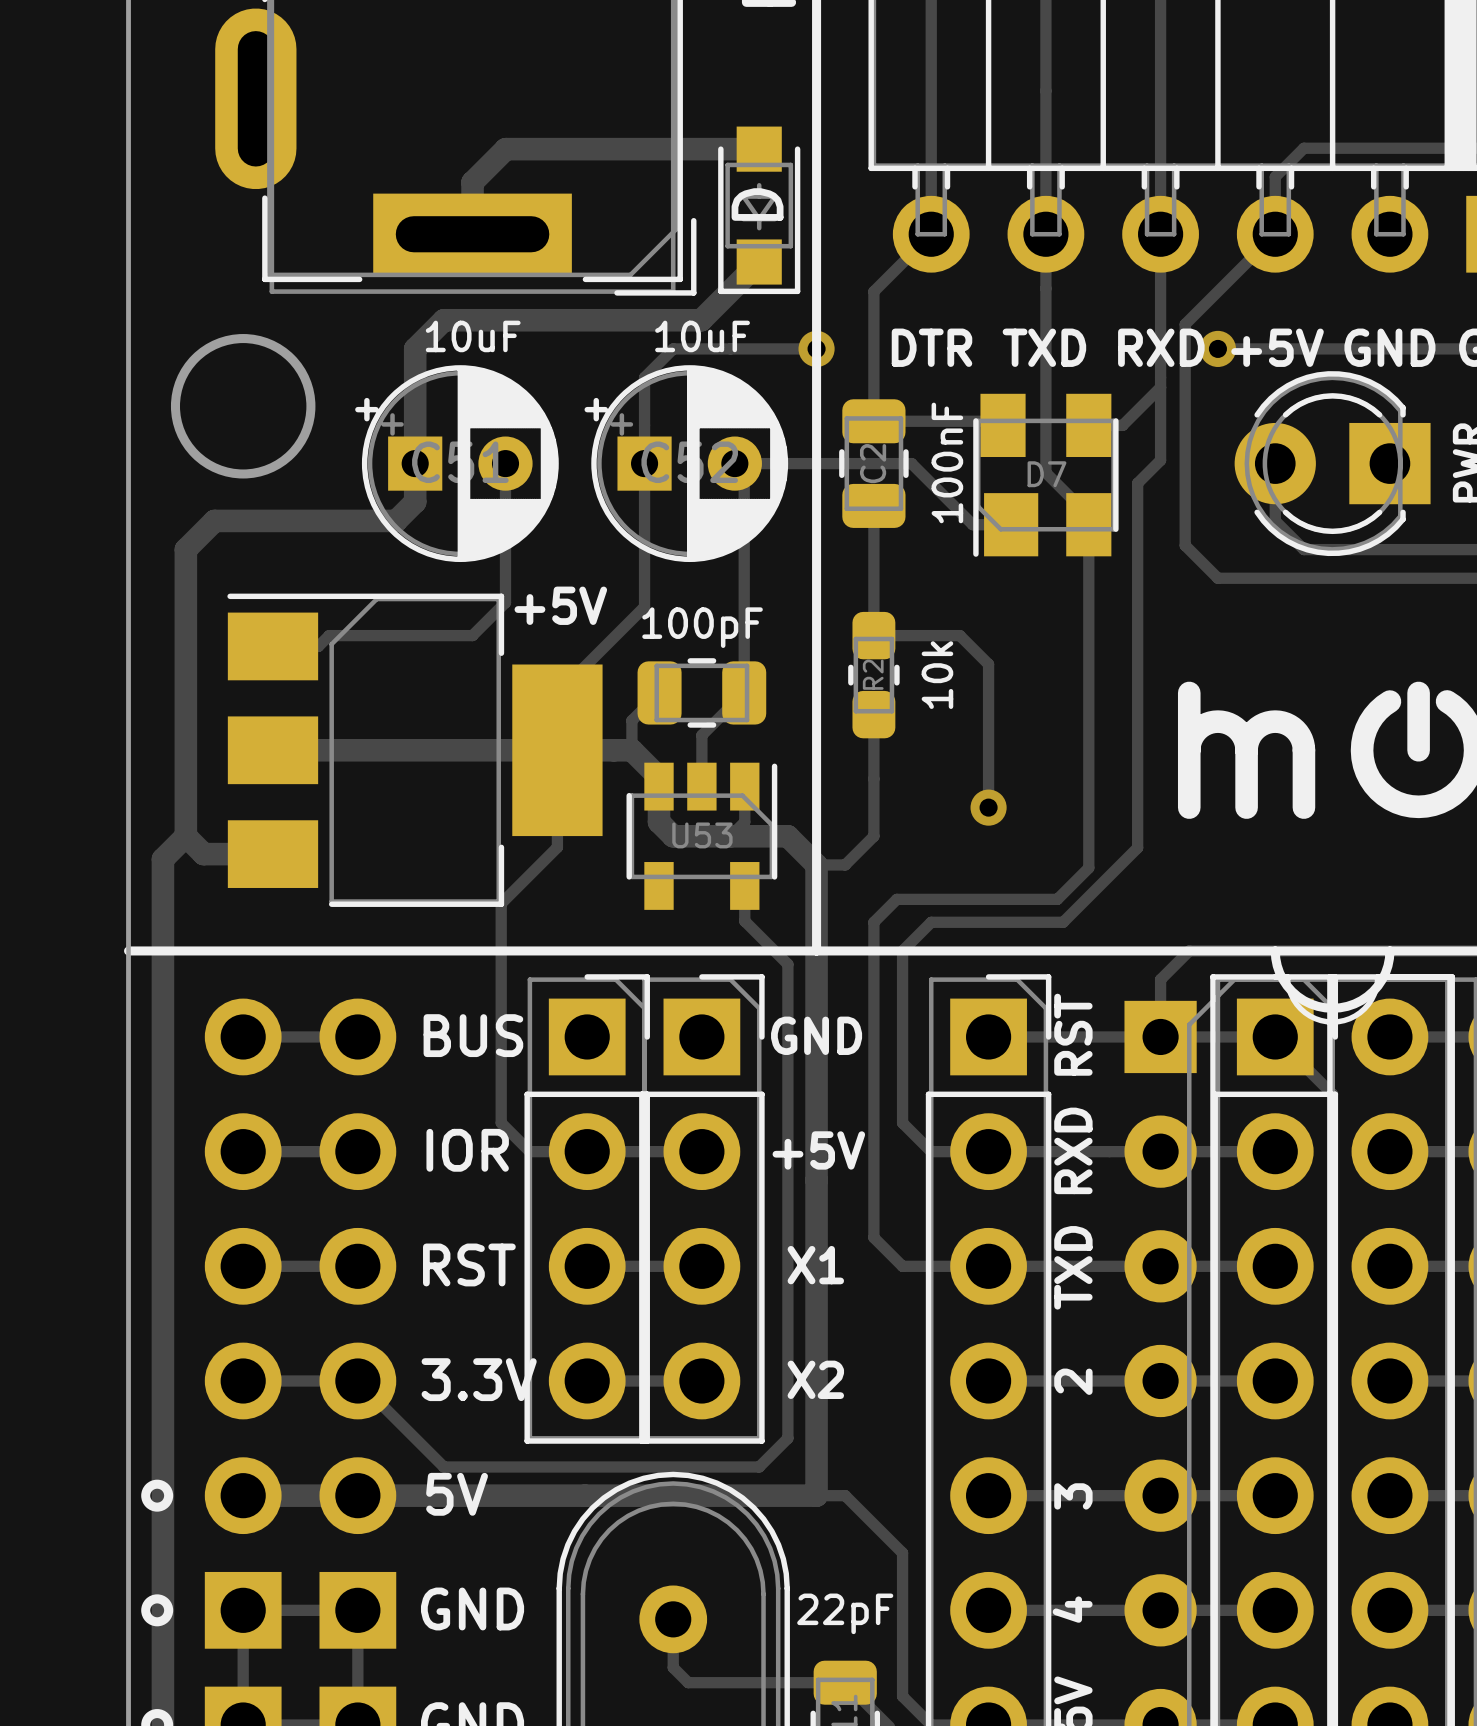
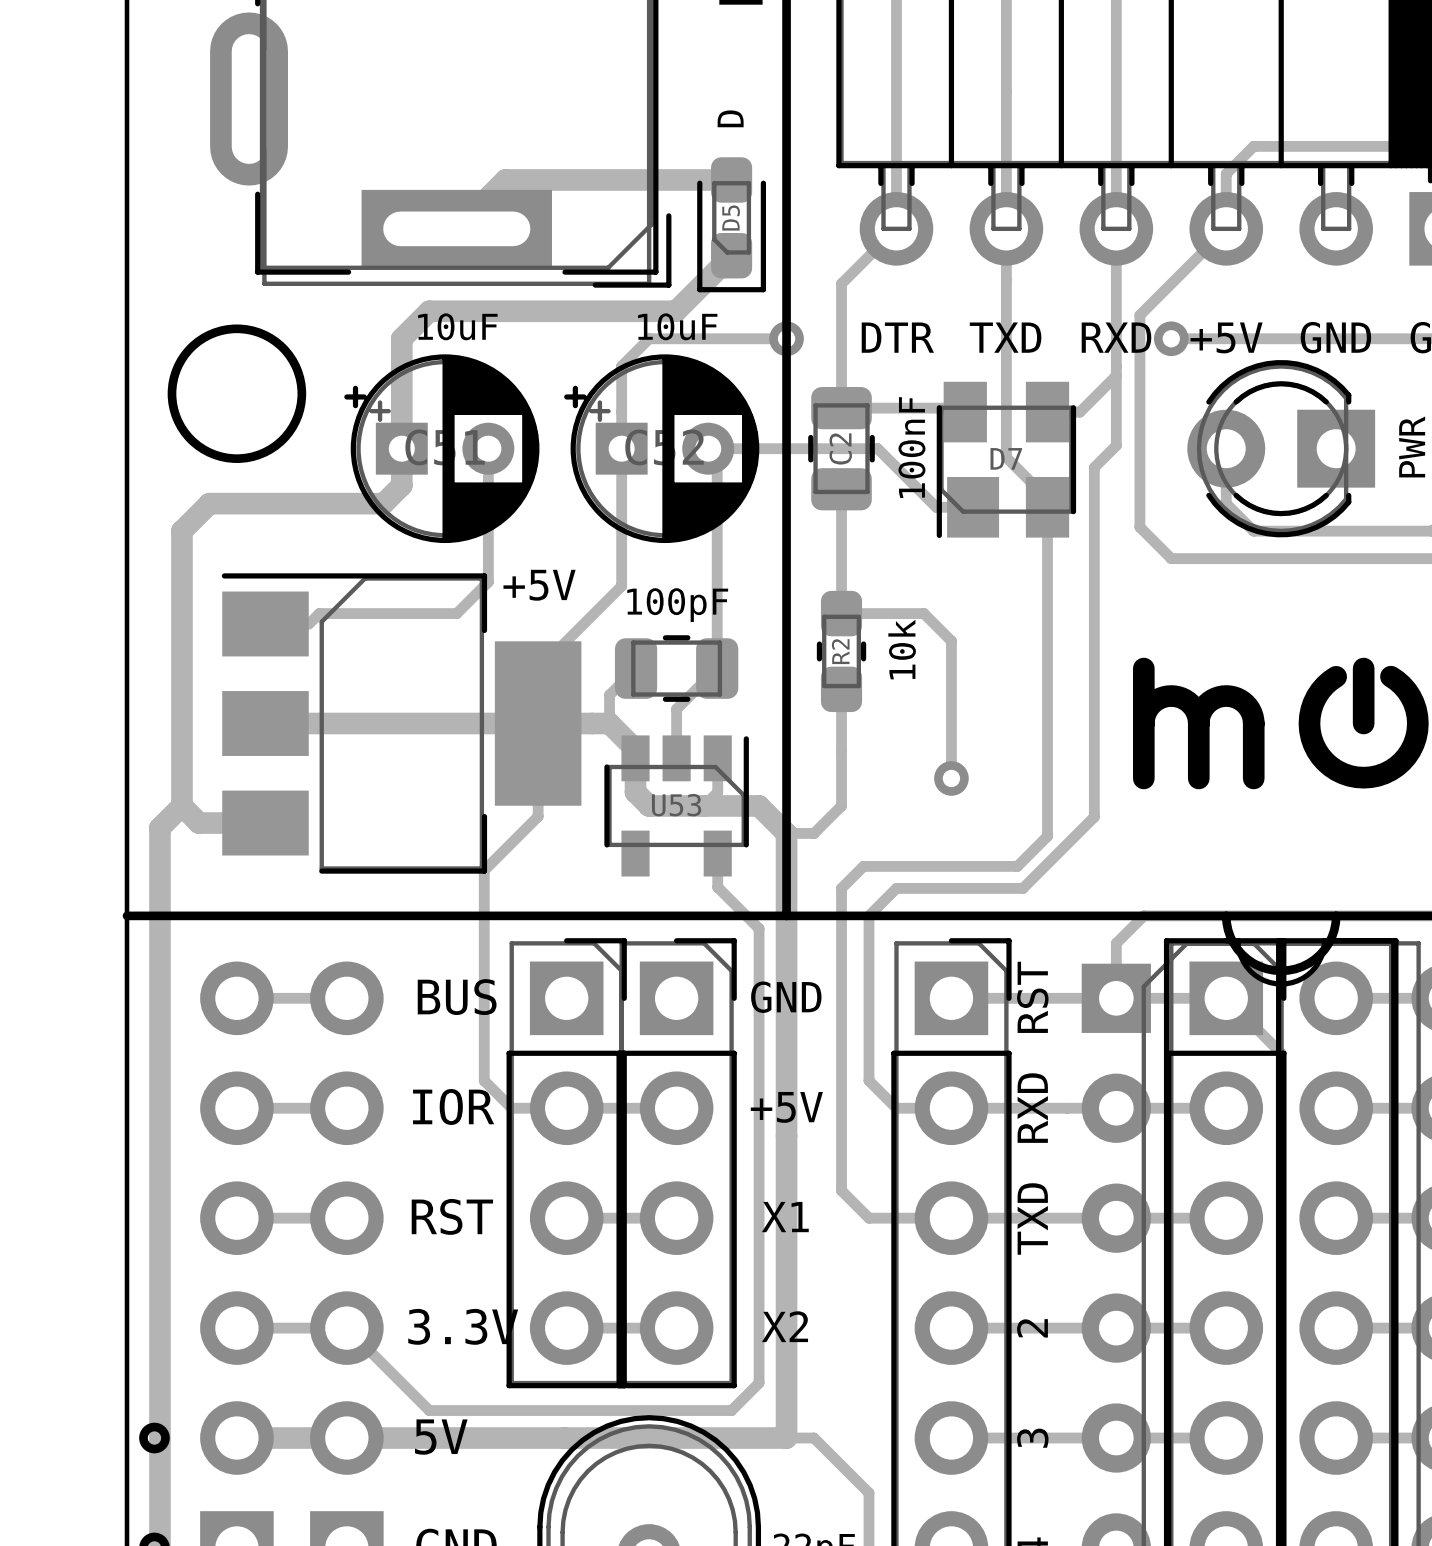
track: (759, 149) (505, 149) (472, 182) (472, 234) -> (731, 179) (505, 179) (456, 228)
part: D (759, 210) -> none
D5: none -> D (731, 224)

